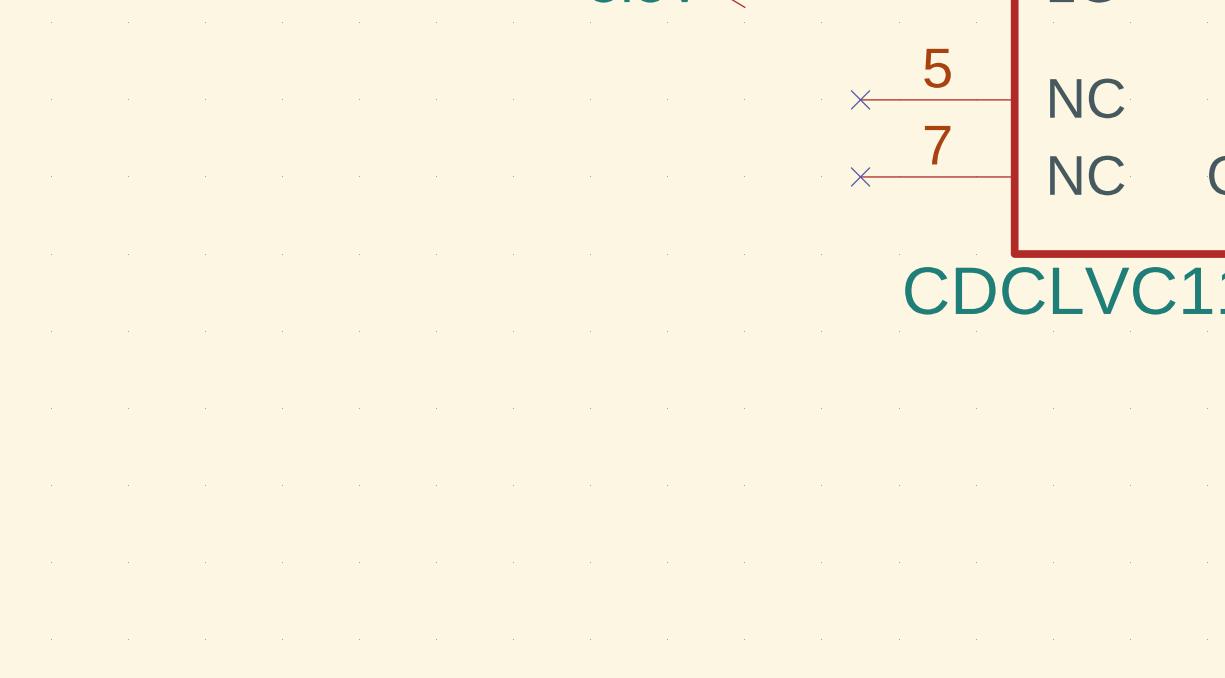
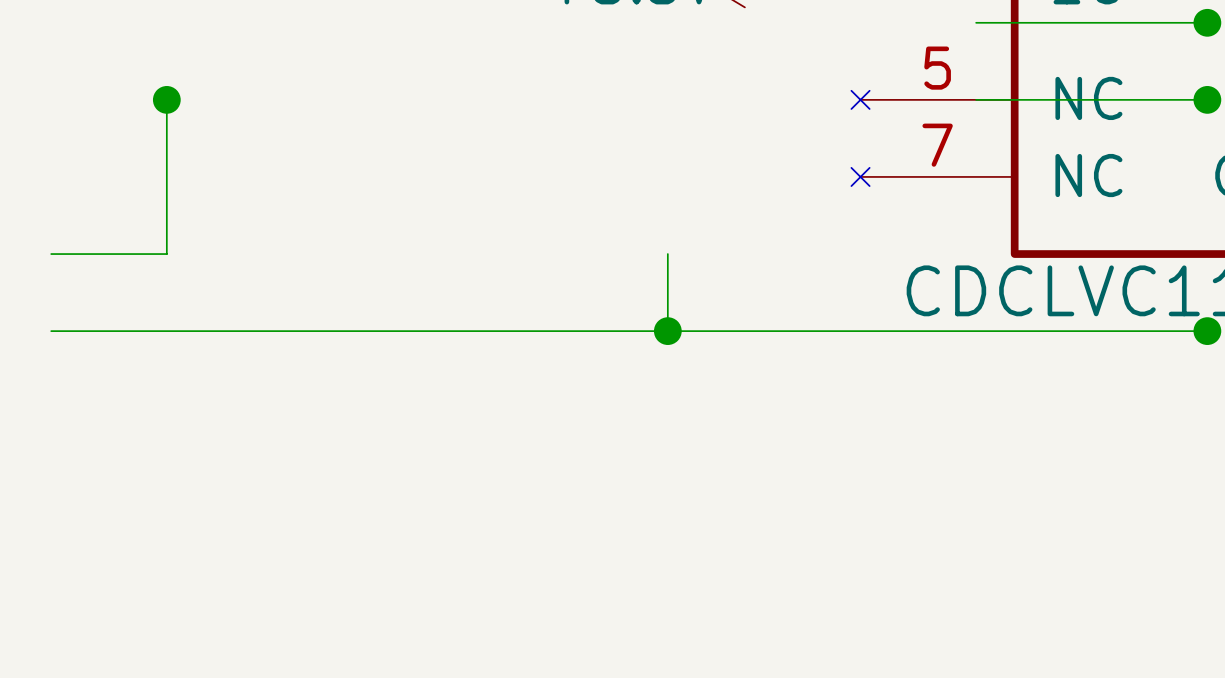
wire: none -> (976, 22) (1207, 22)
junction: none -> (1207, 22)
wire: none -> (166, 99) (166, 254) (51, 254)
junction: none -> (166, 99)
wire: none -> (976, 99) (1207, 99)
junction: none -> (1207, 99)
wire: none -> (667, 254) (667, 331)
wire: none -> (51, 331) (1207, 331)
junction: none -> (667, 331)
junction: none -> (1207, 331)

